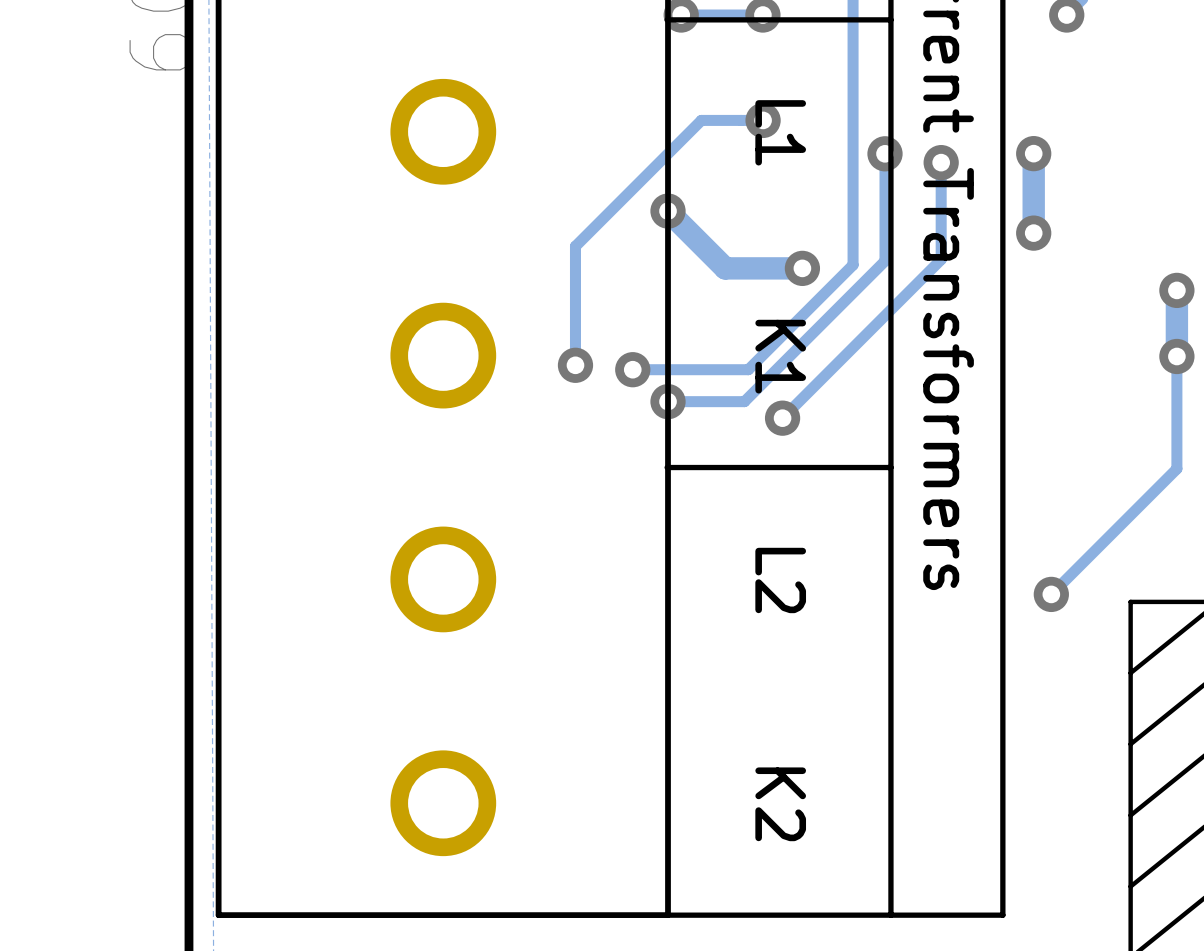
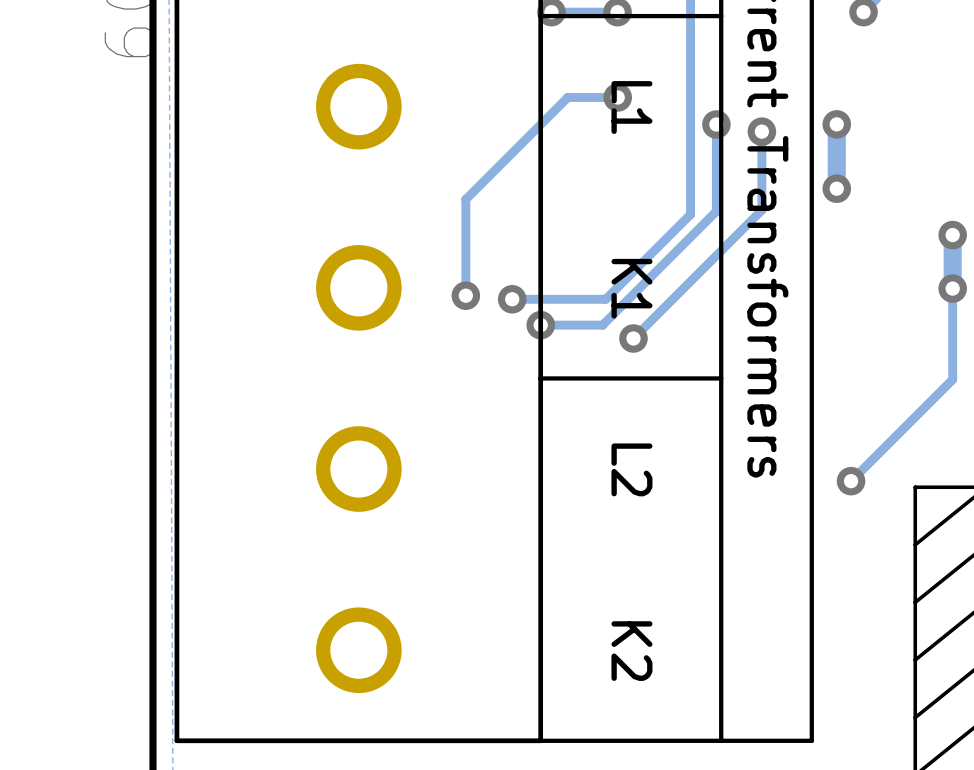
track: (668, 211) (725, 268) (802, 268) -> none
via: (668, 211) -> none
via: (802, 268) -> none

